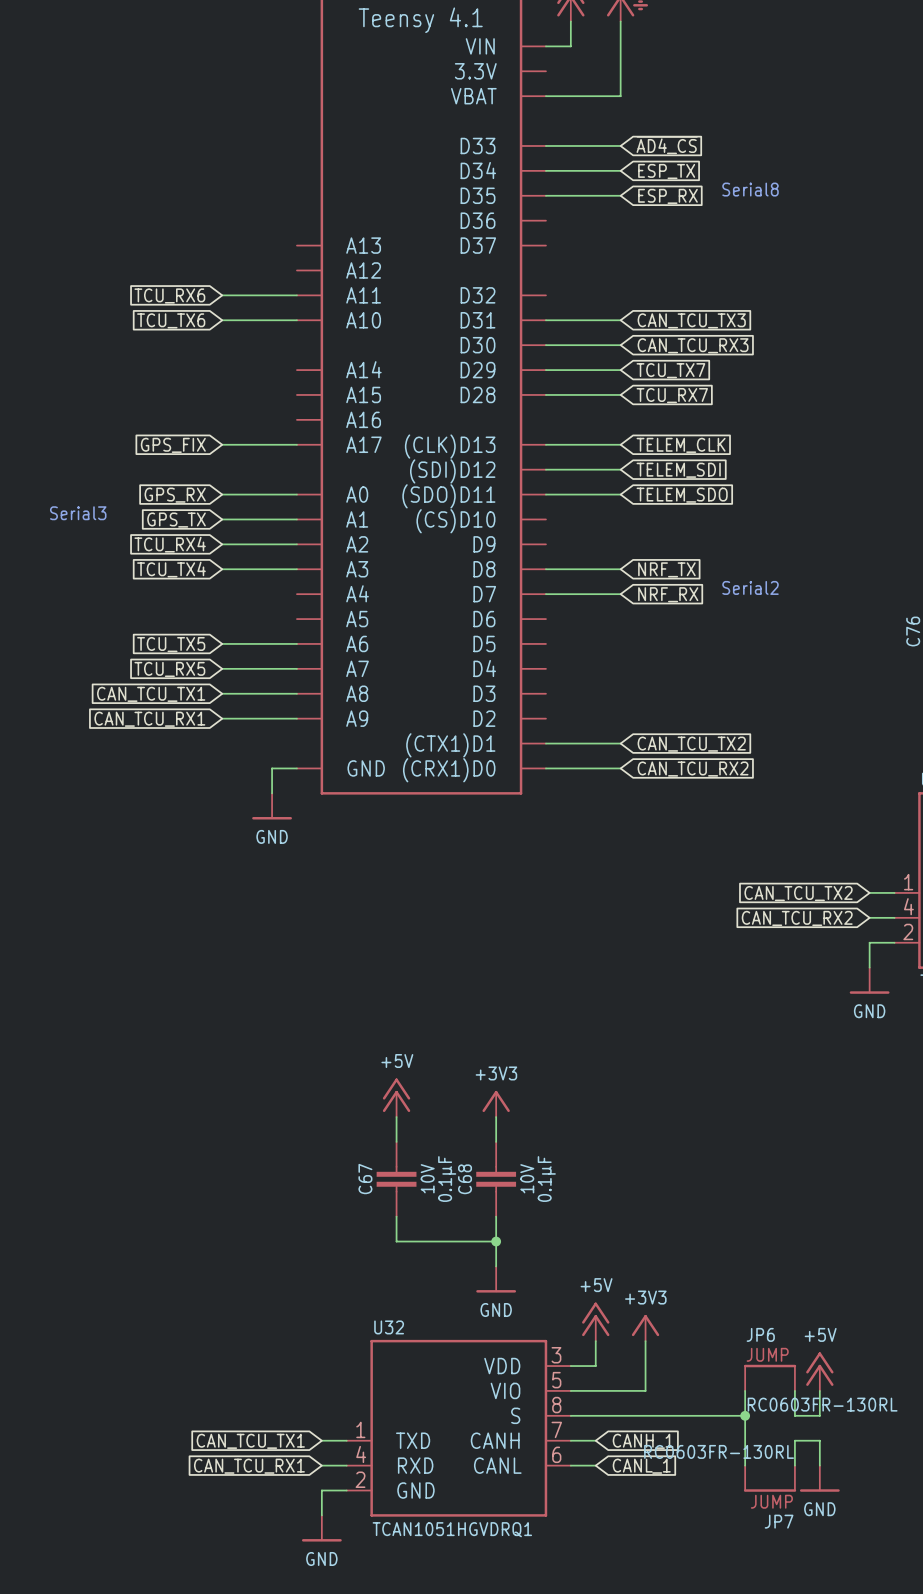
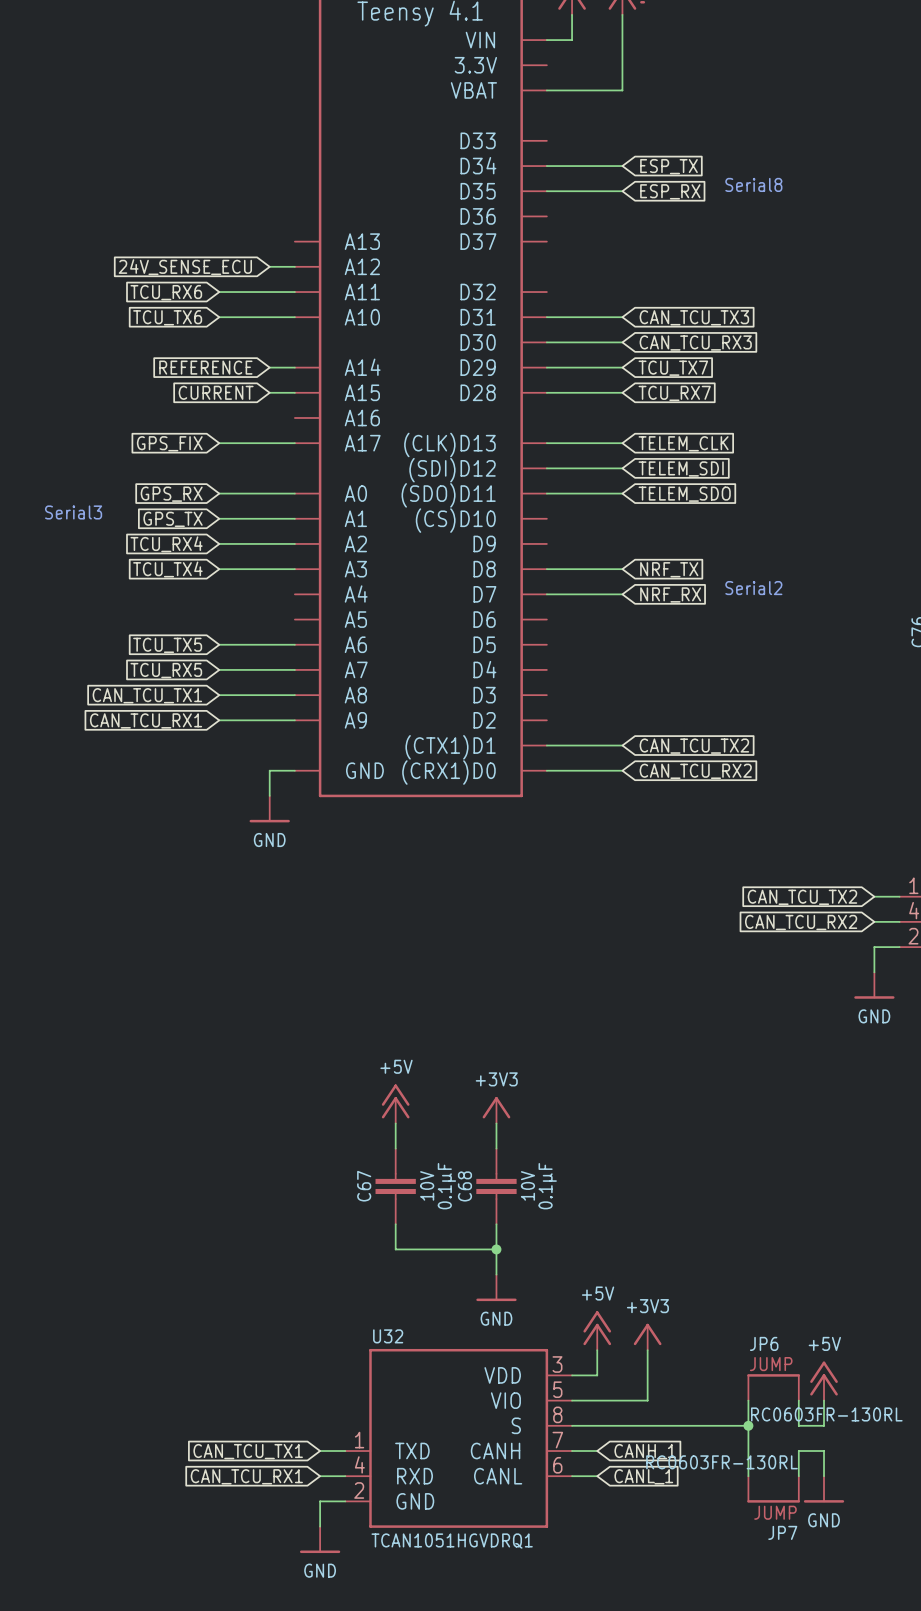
wire: (545, 145) (620, 145) -> none
global label: ~{AD4_CS} (667, 145) -> none
global label: none -> 24V_SENSE_ECU (185, 267)
wire: none -> (269, 266) (294, 266)
global label: none -> REFERENCE (205, 367)
wire: none -> (269, 367) (294, 367)
global label: none -> CURRENT (216, 392)
wire: none -> (269, 392) (294, 392)

